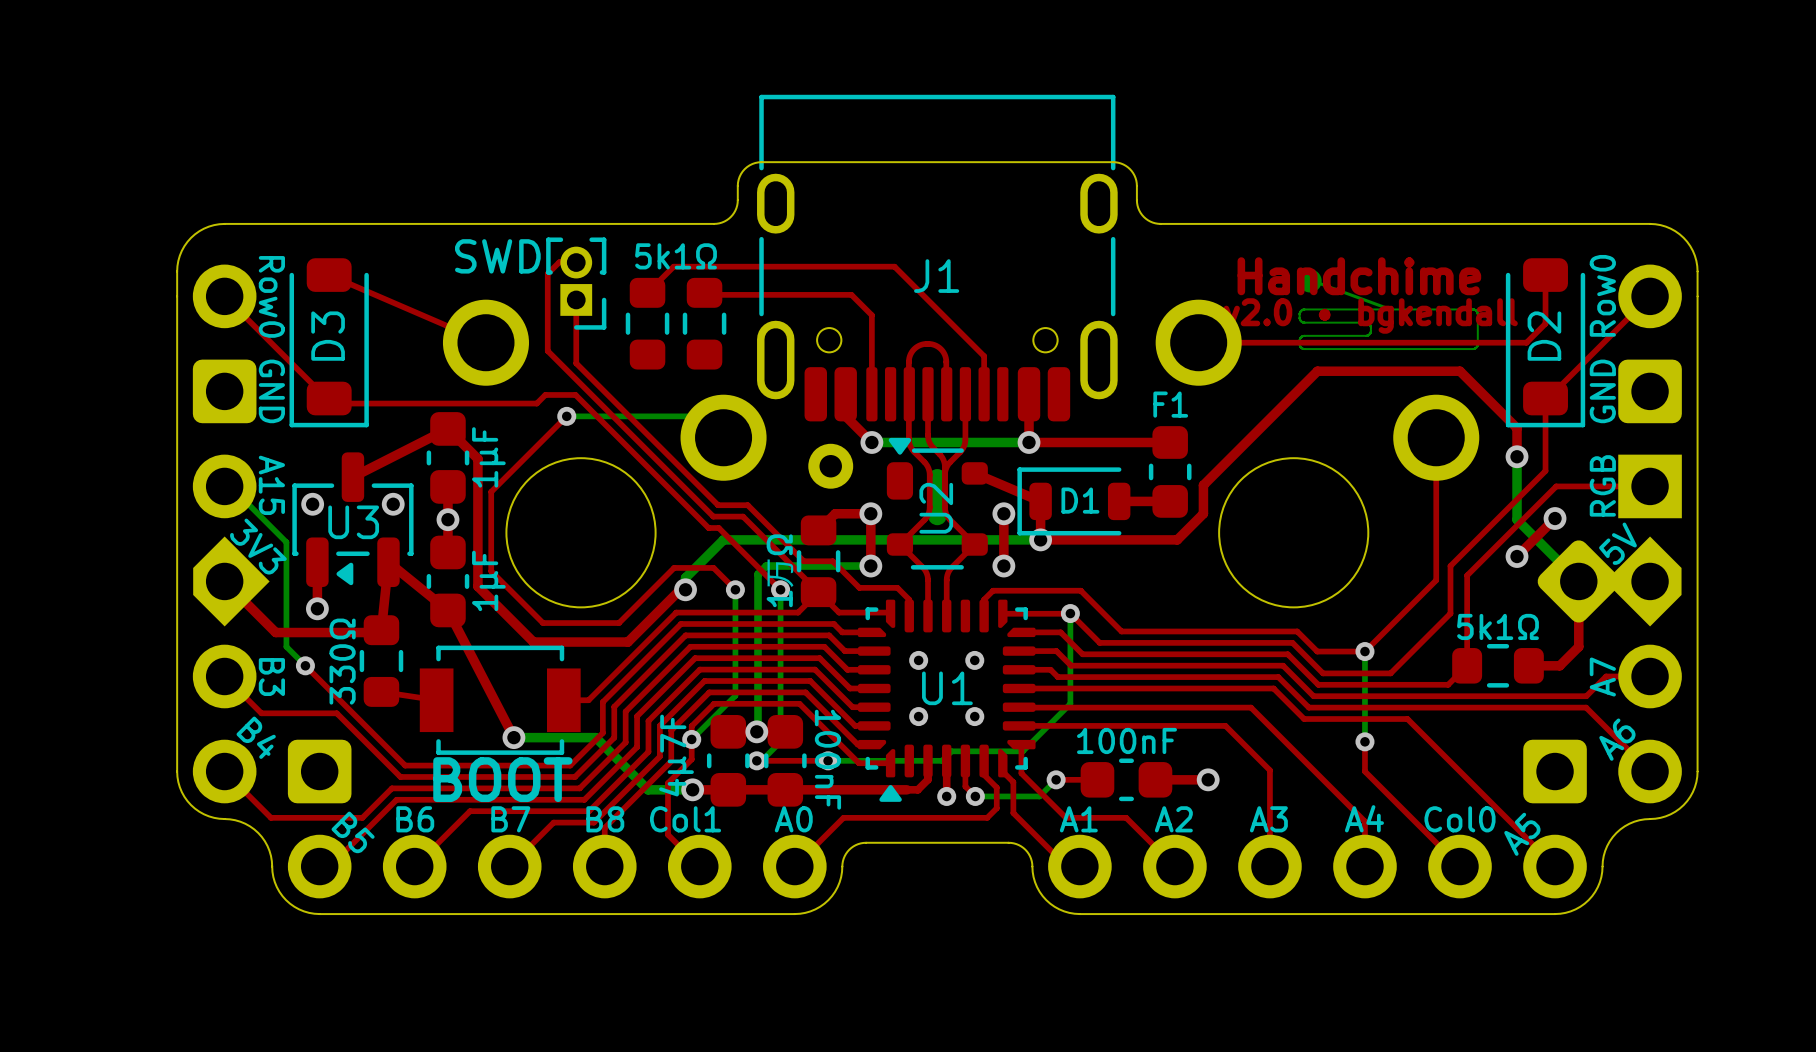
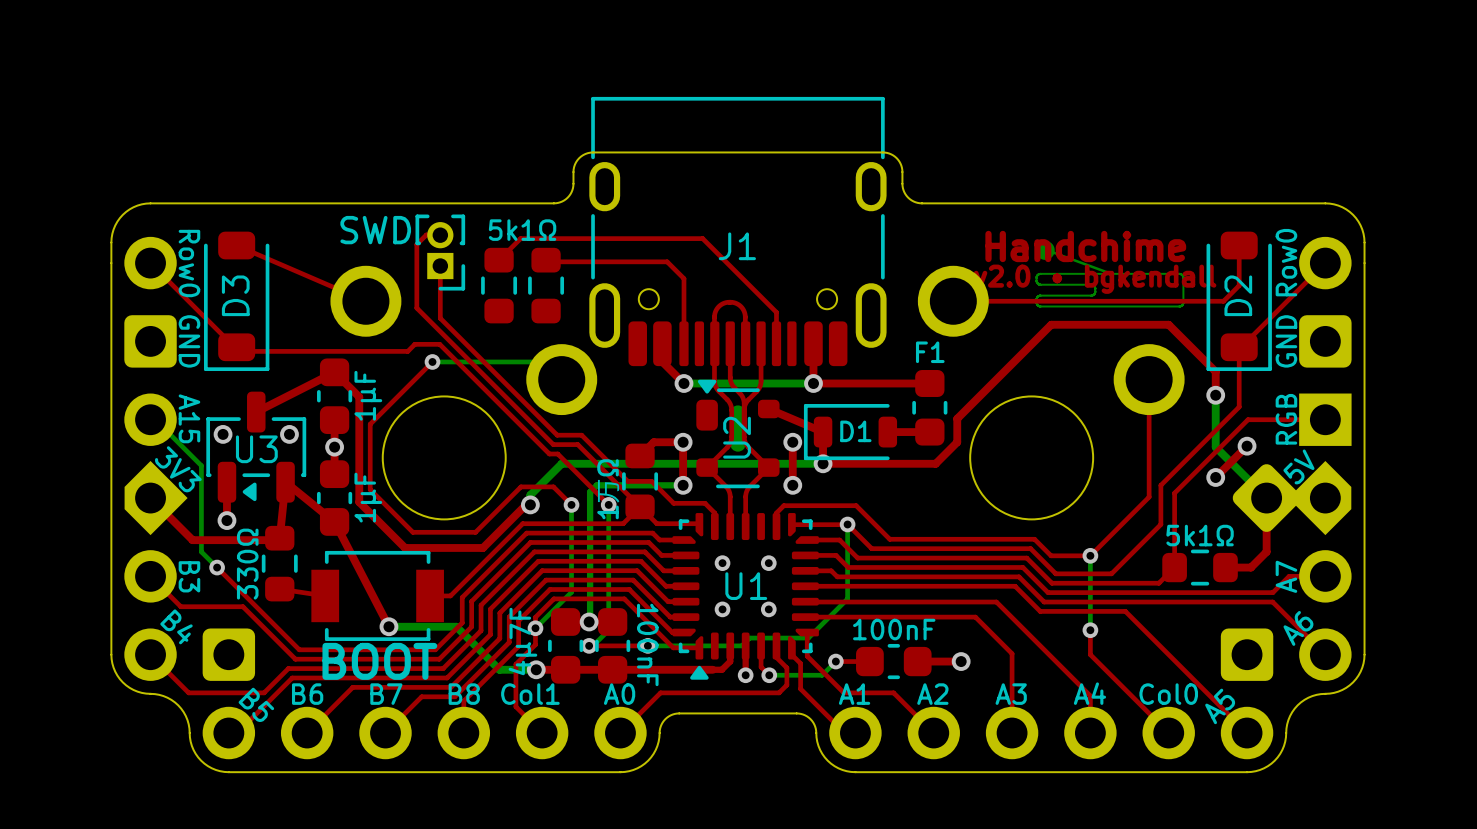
part: (830, 466) -> none

